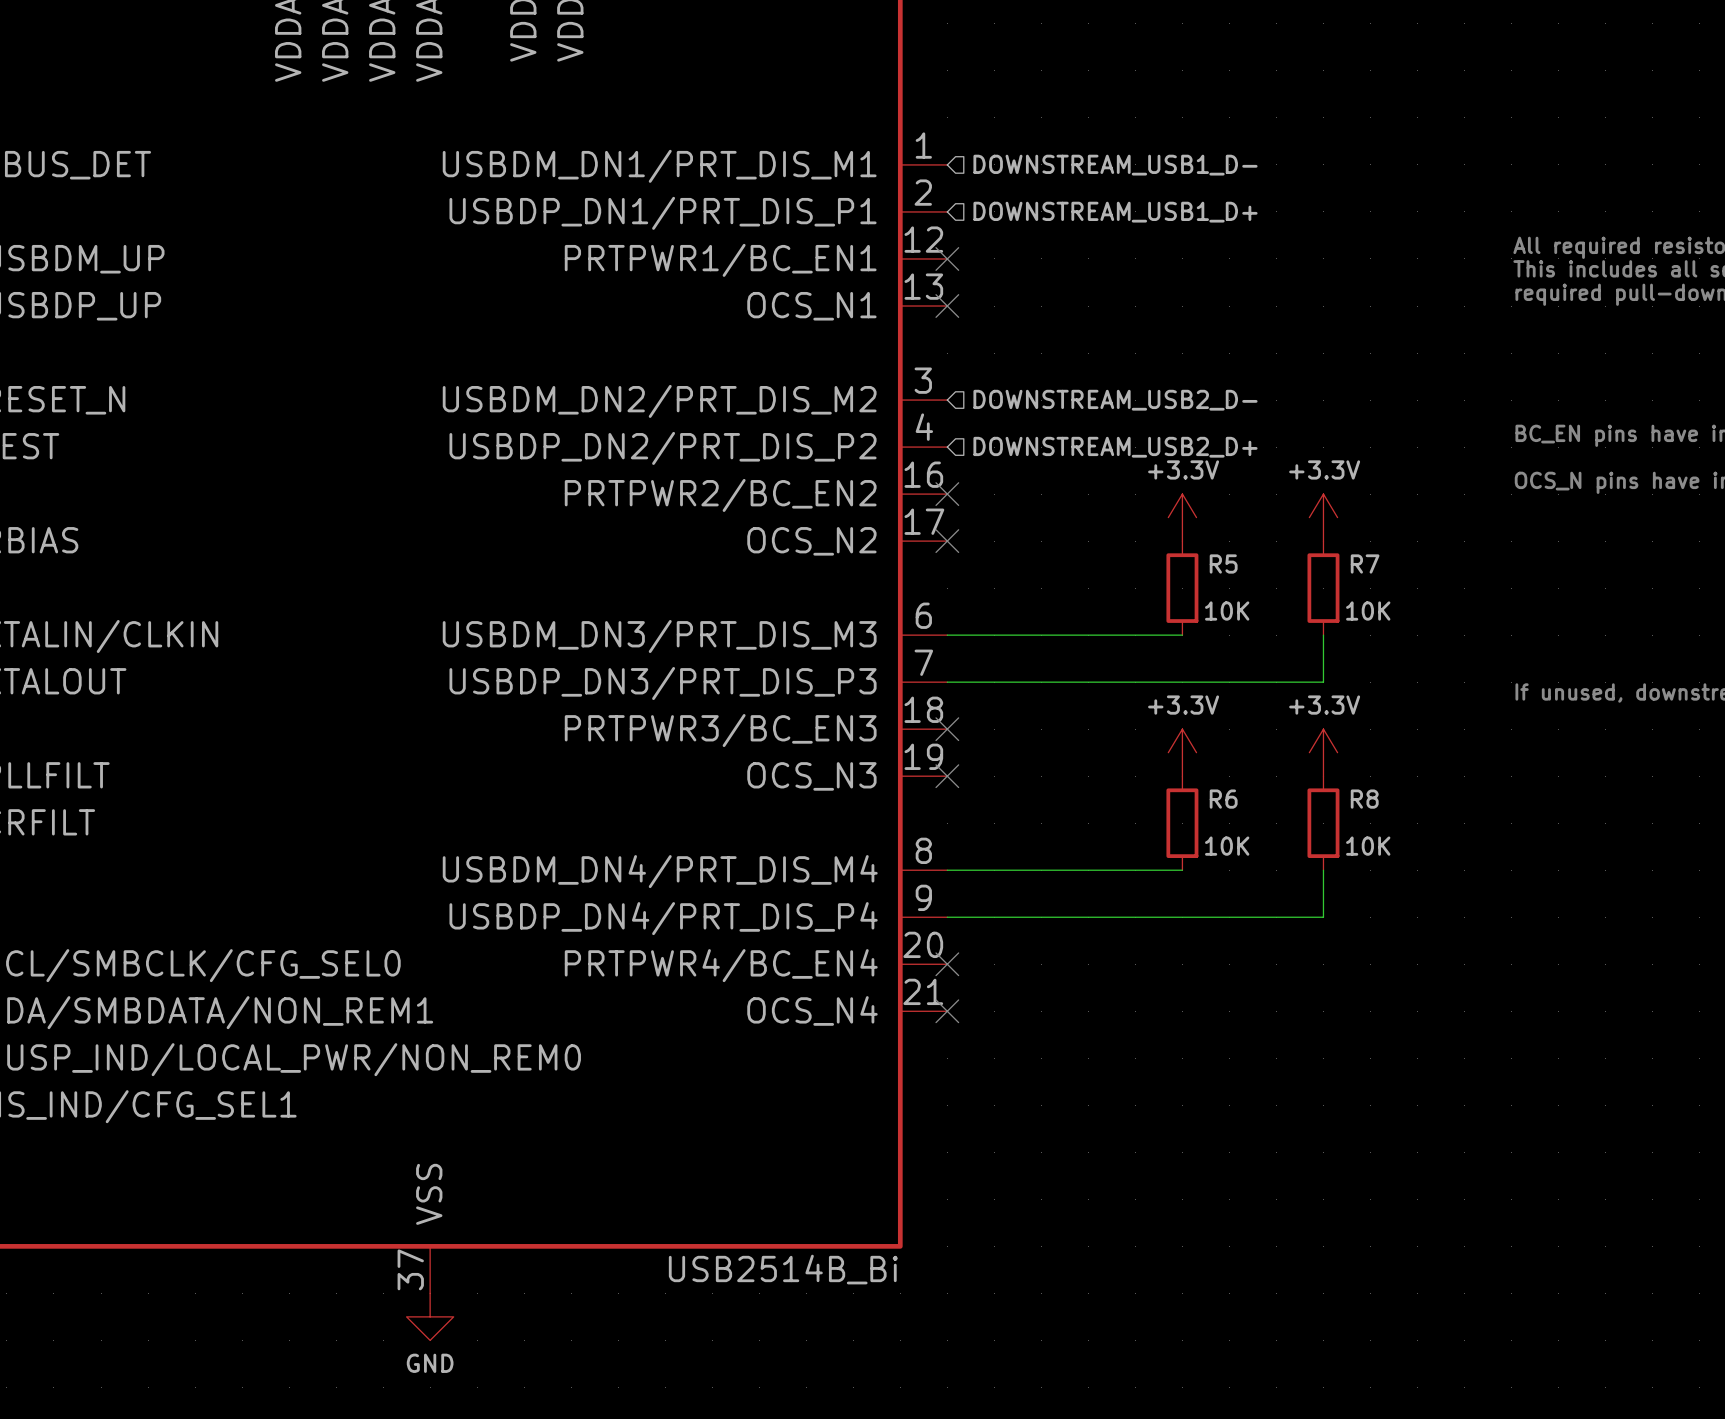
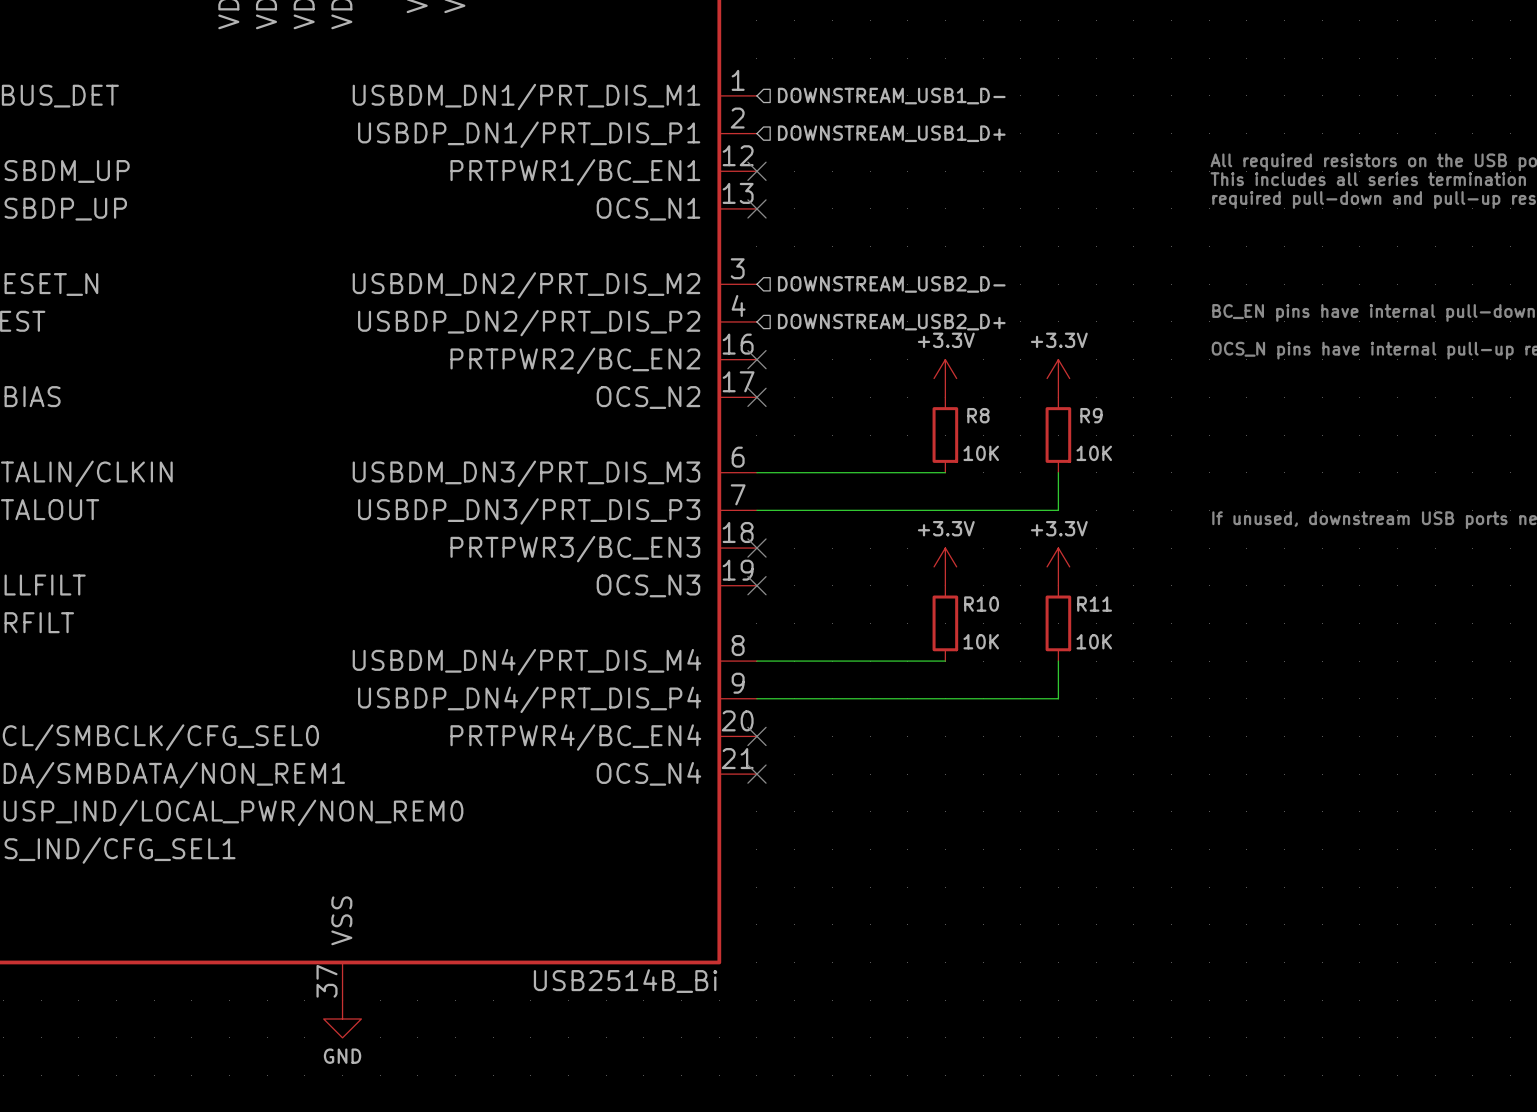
R5 name: R5 (1223, 563) -> R8 (978, 415)
R7 name: R7 (1365, 563) -> R9 (1091, 415)
R6 name: R6 (1223, 799) -> R10 (981, 604)
R8 name: R8 (1364, 799) -> R11 (1094, 604)

